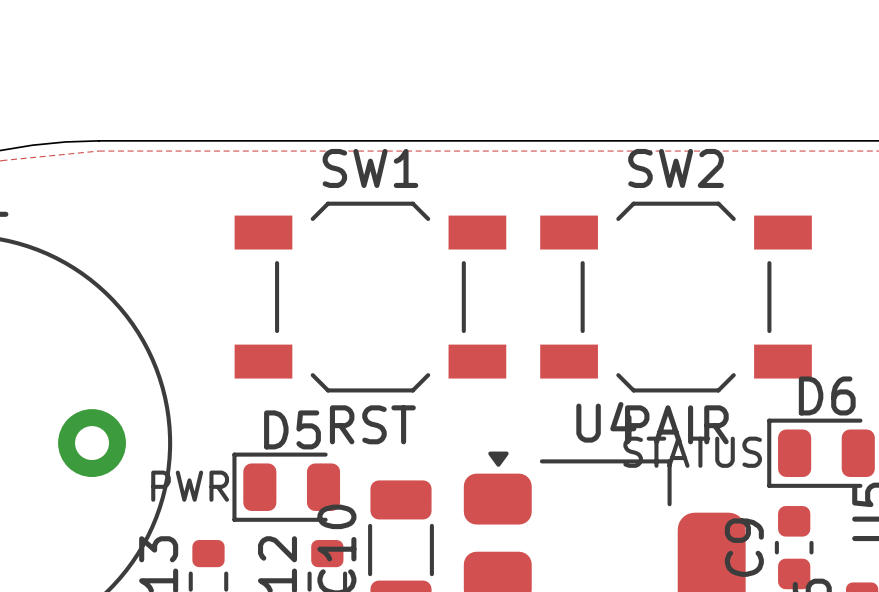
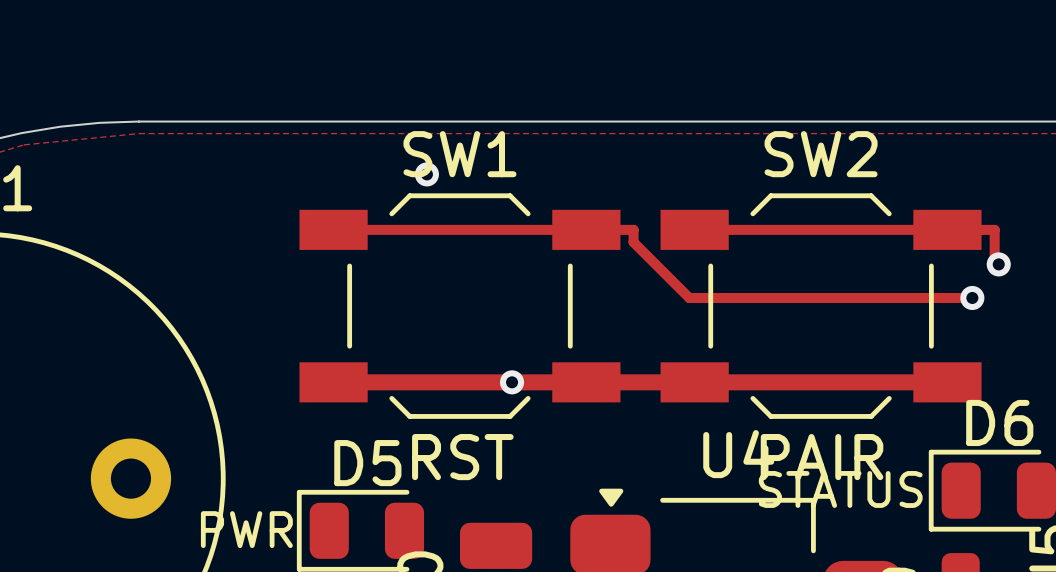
via: none -> (426, 174)
track: none -> (333, 229) (633, 229) (633, 242) (689, 297) (972, 297)
track: none -> (694, 229) (994, 229) (994, 260) (998, 264)
via: none -> (998, 264)
via: none -> (972, 297)
track: none -> (333, 382) (947, 382)
via: none -> (512, 382)

